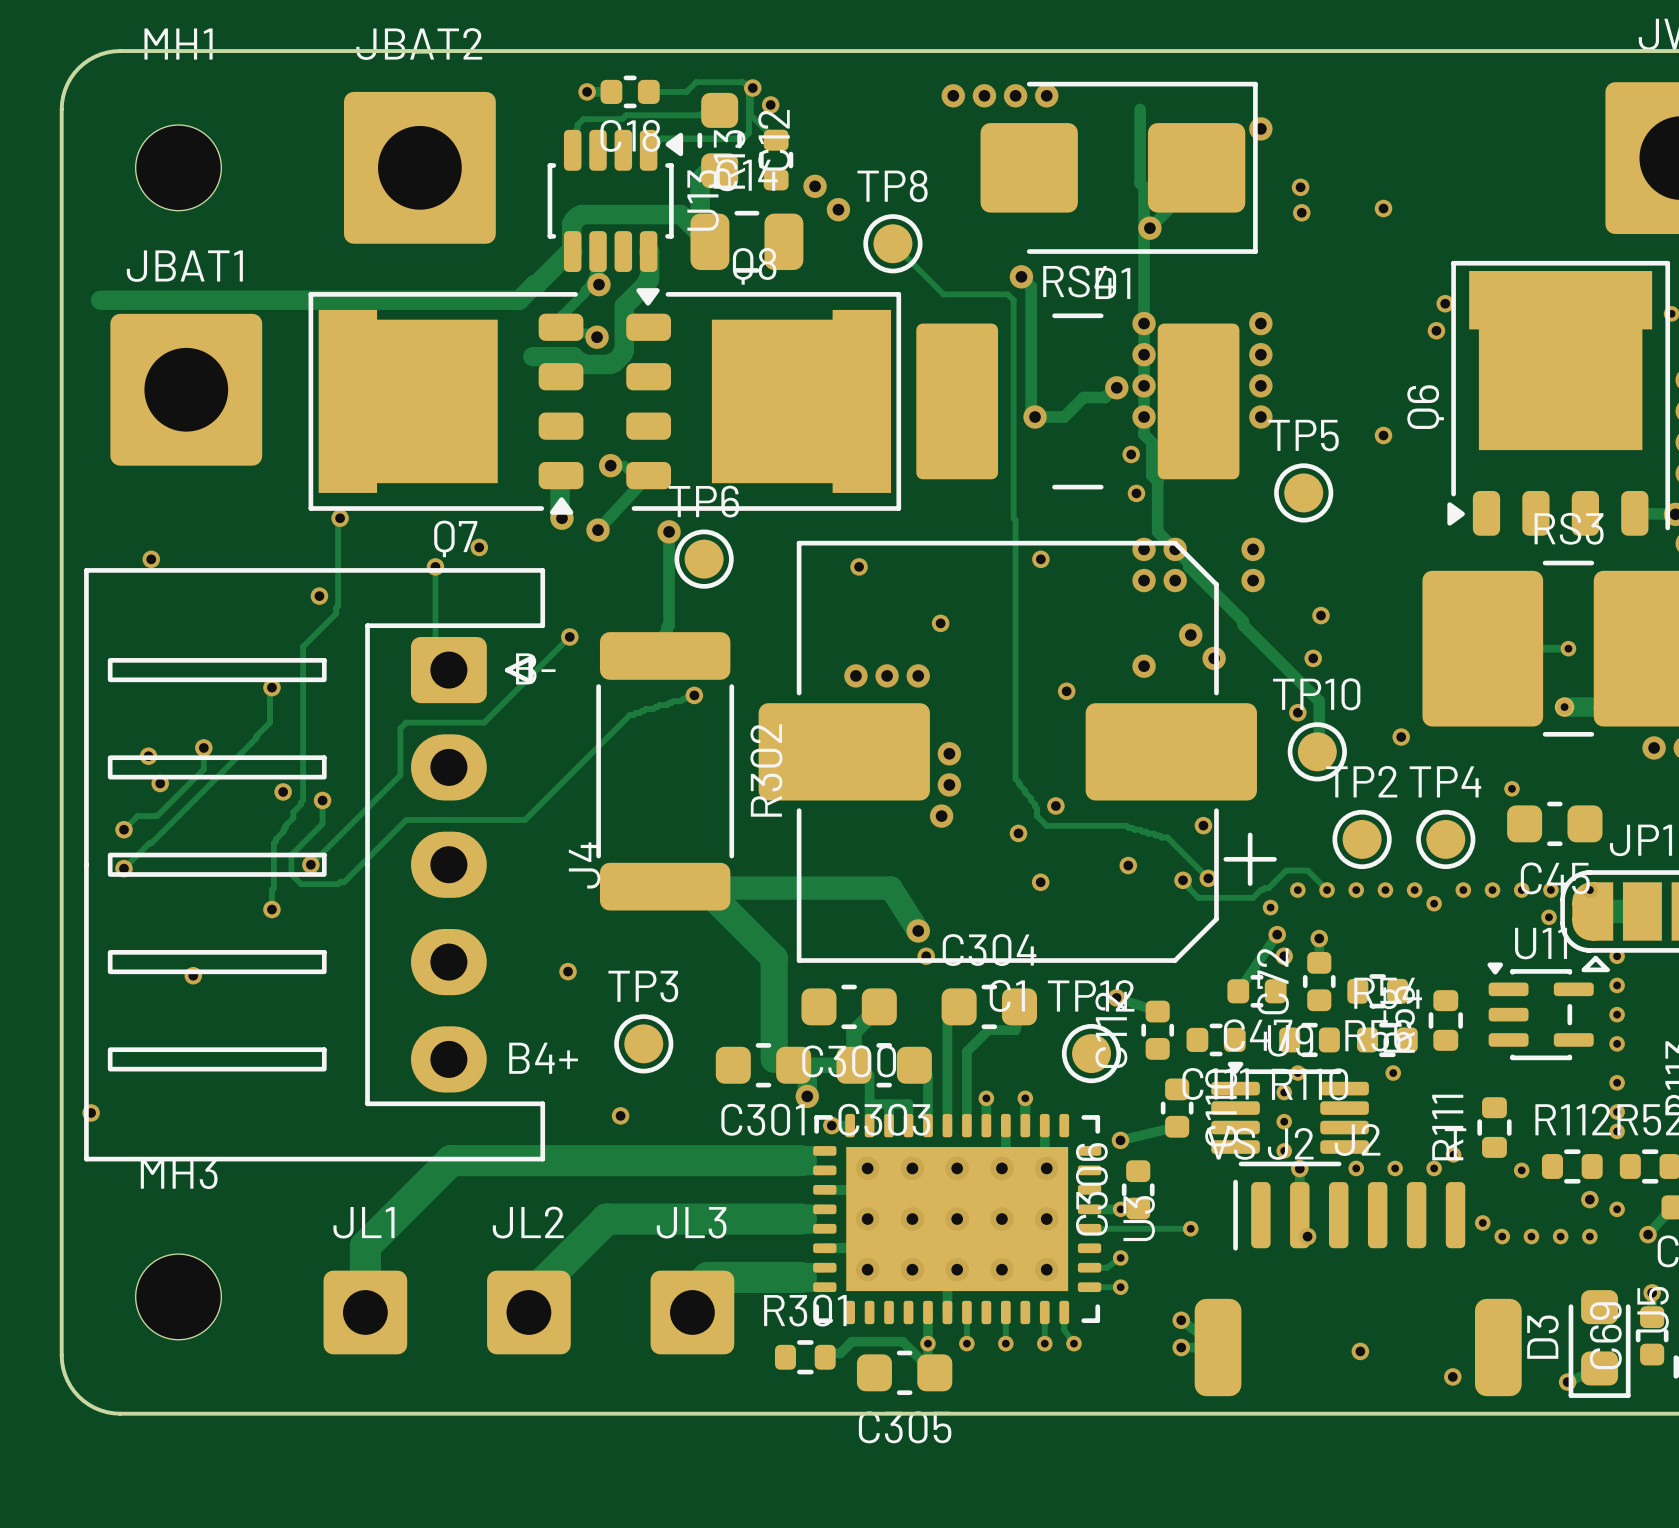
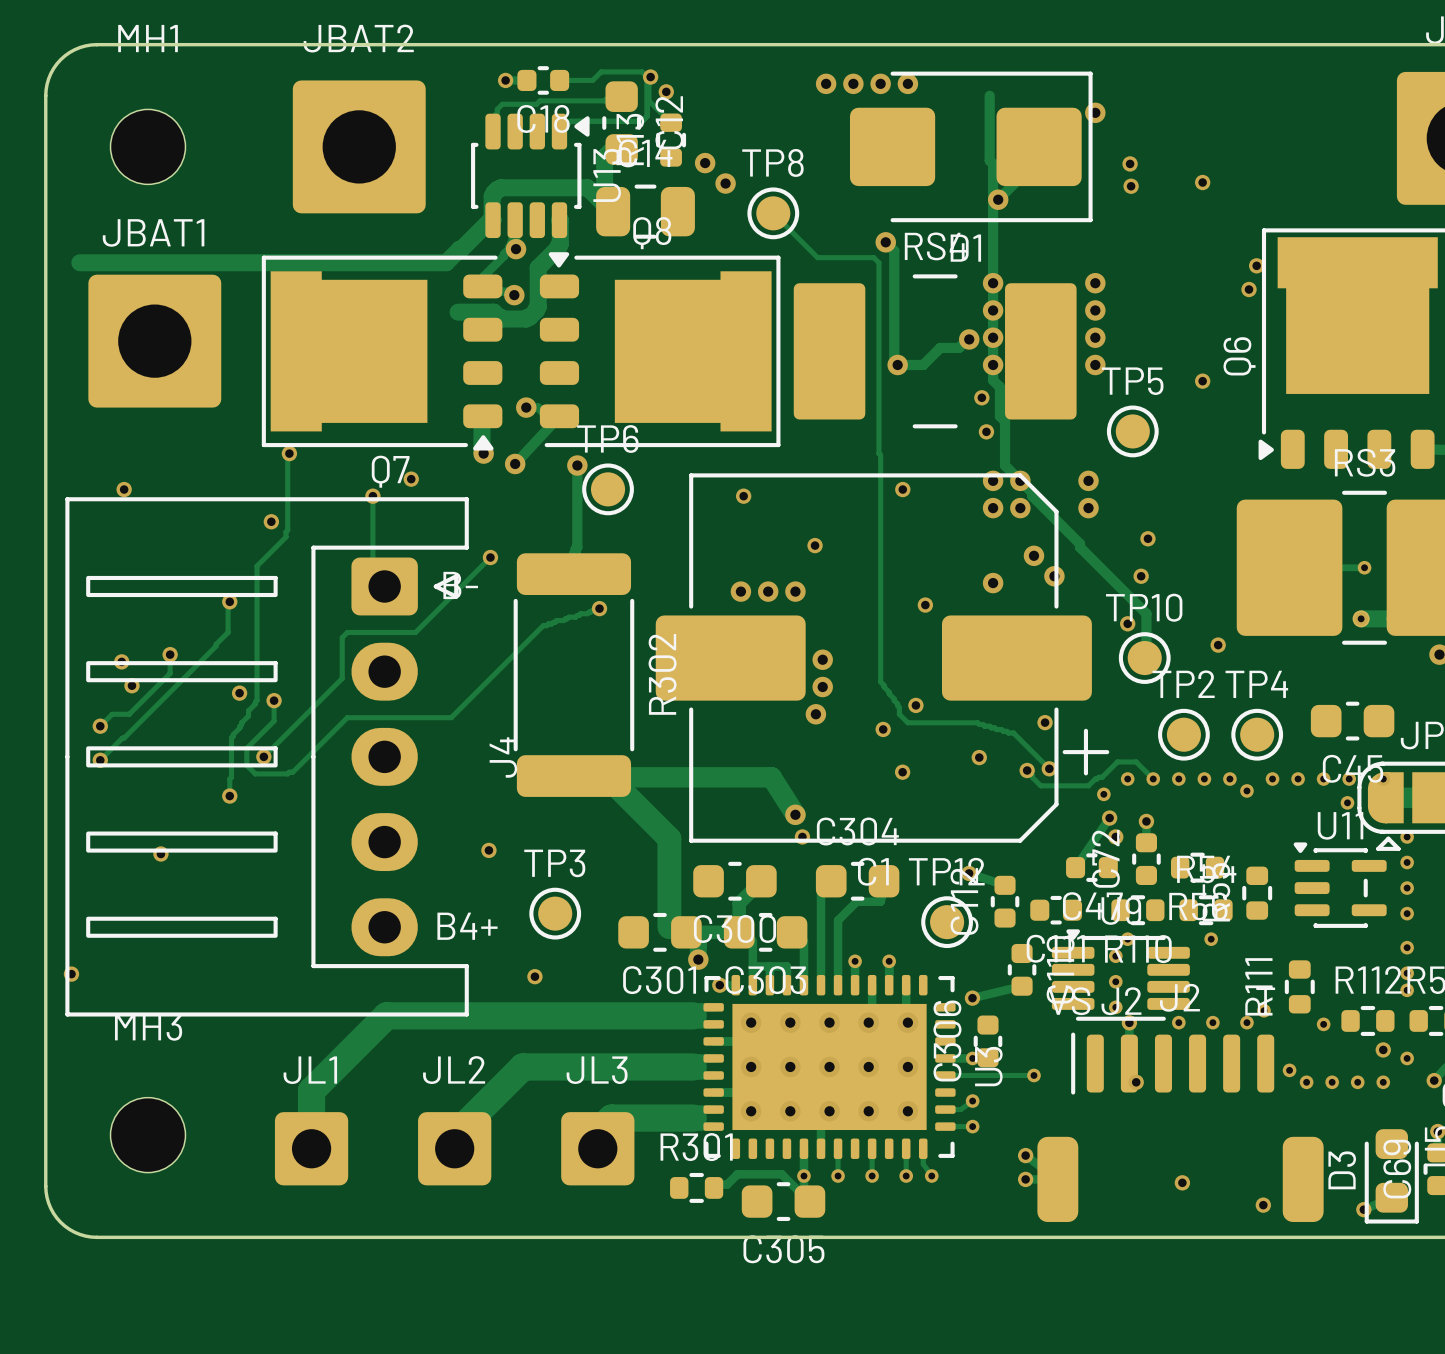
via: (1511, 788) -> none

